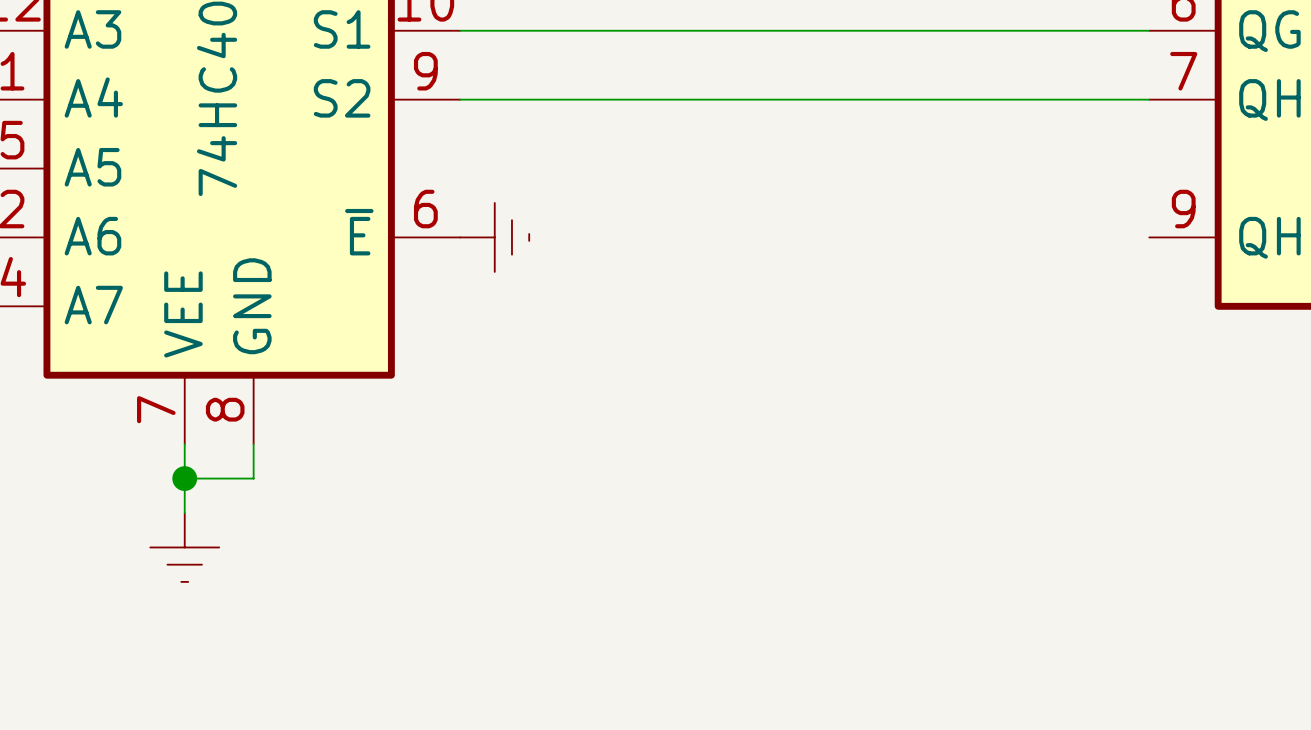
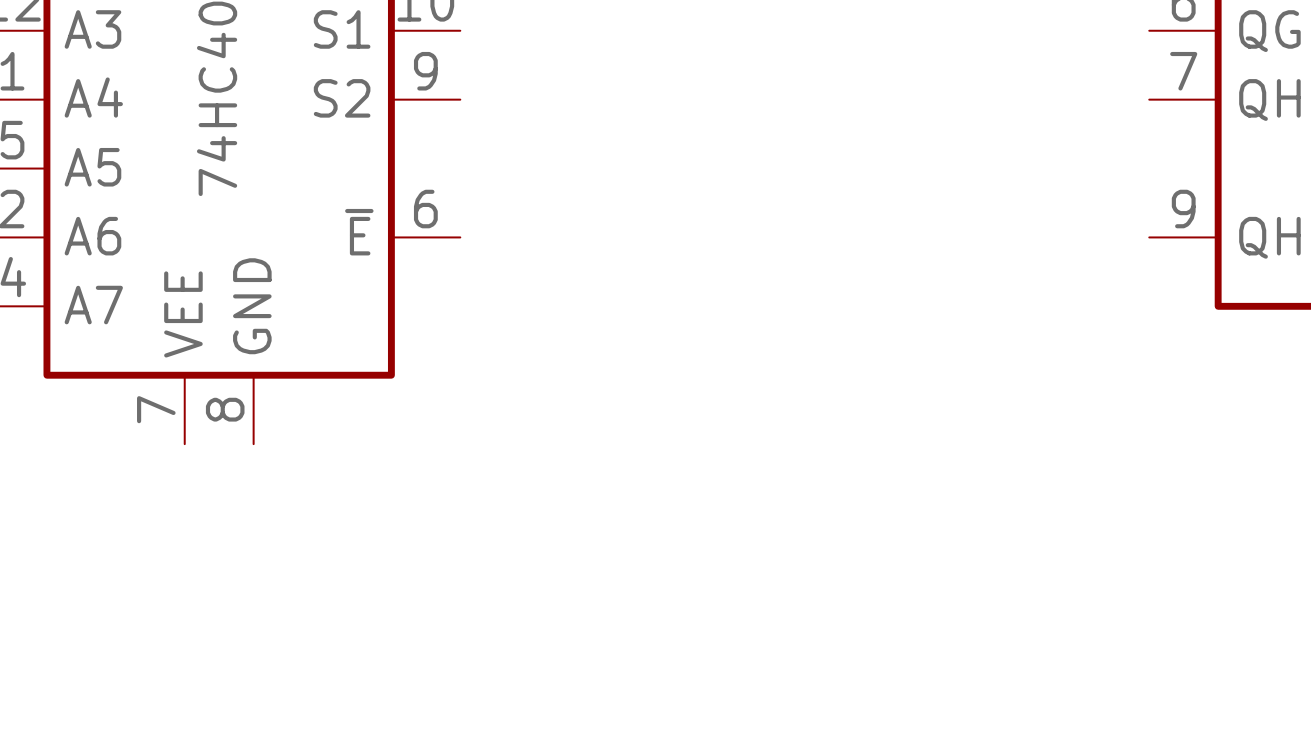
wire: (460, 30) (1149, 30) -> none
wire: (460, 99) (1149, 99) -> none
power symbol: (494, 237) -> none
wire: (184, 444) (184, 513) -> none
wire: (253, 444) (253, 478) (184, 478) -> none
junction: (184, 478) -> none
power symbol: (184, 547) -> none

